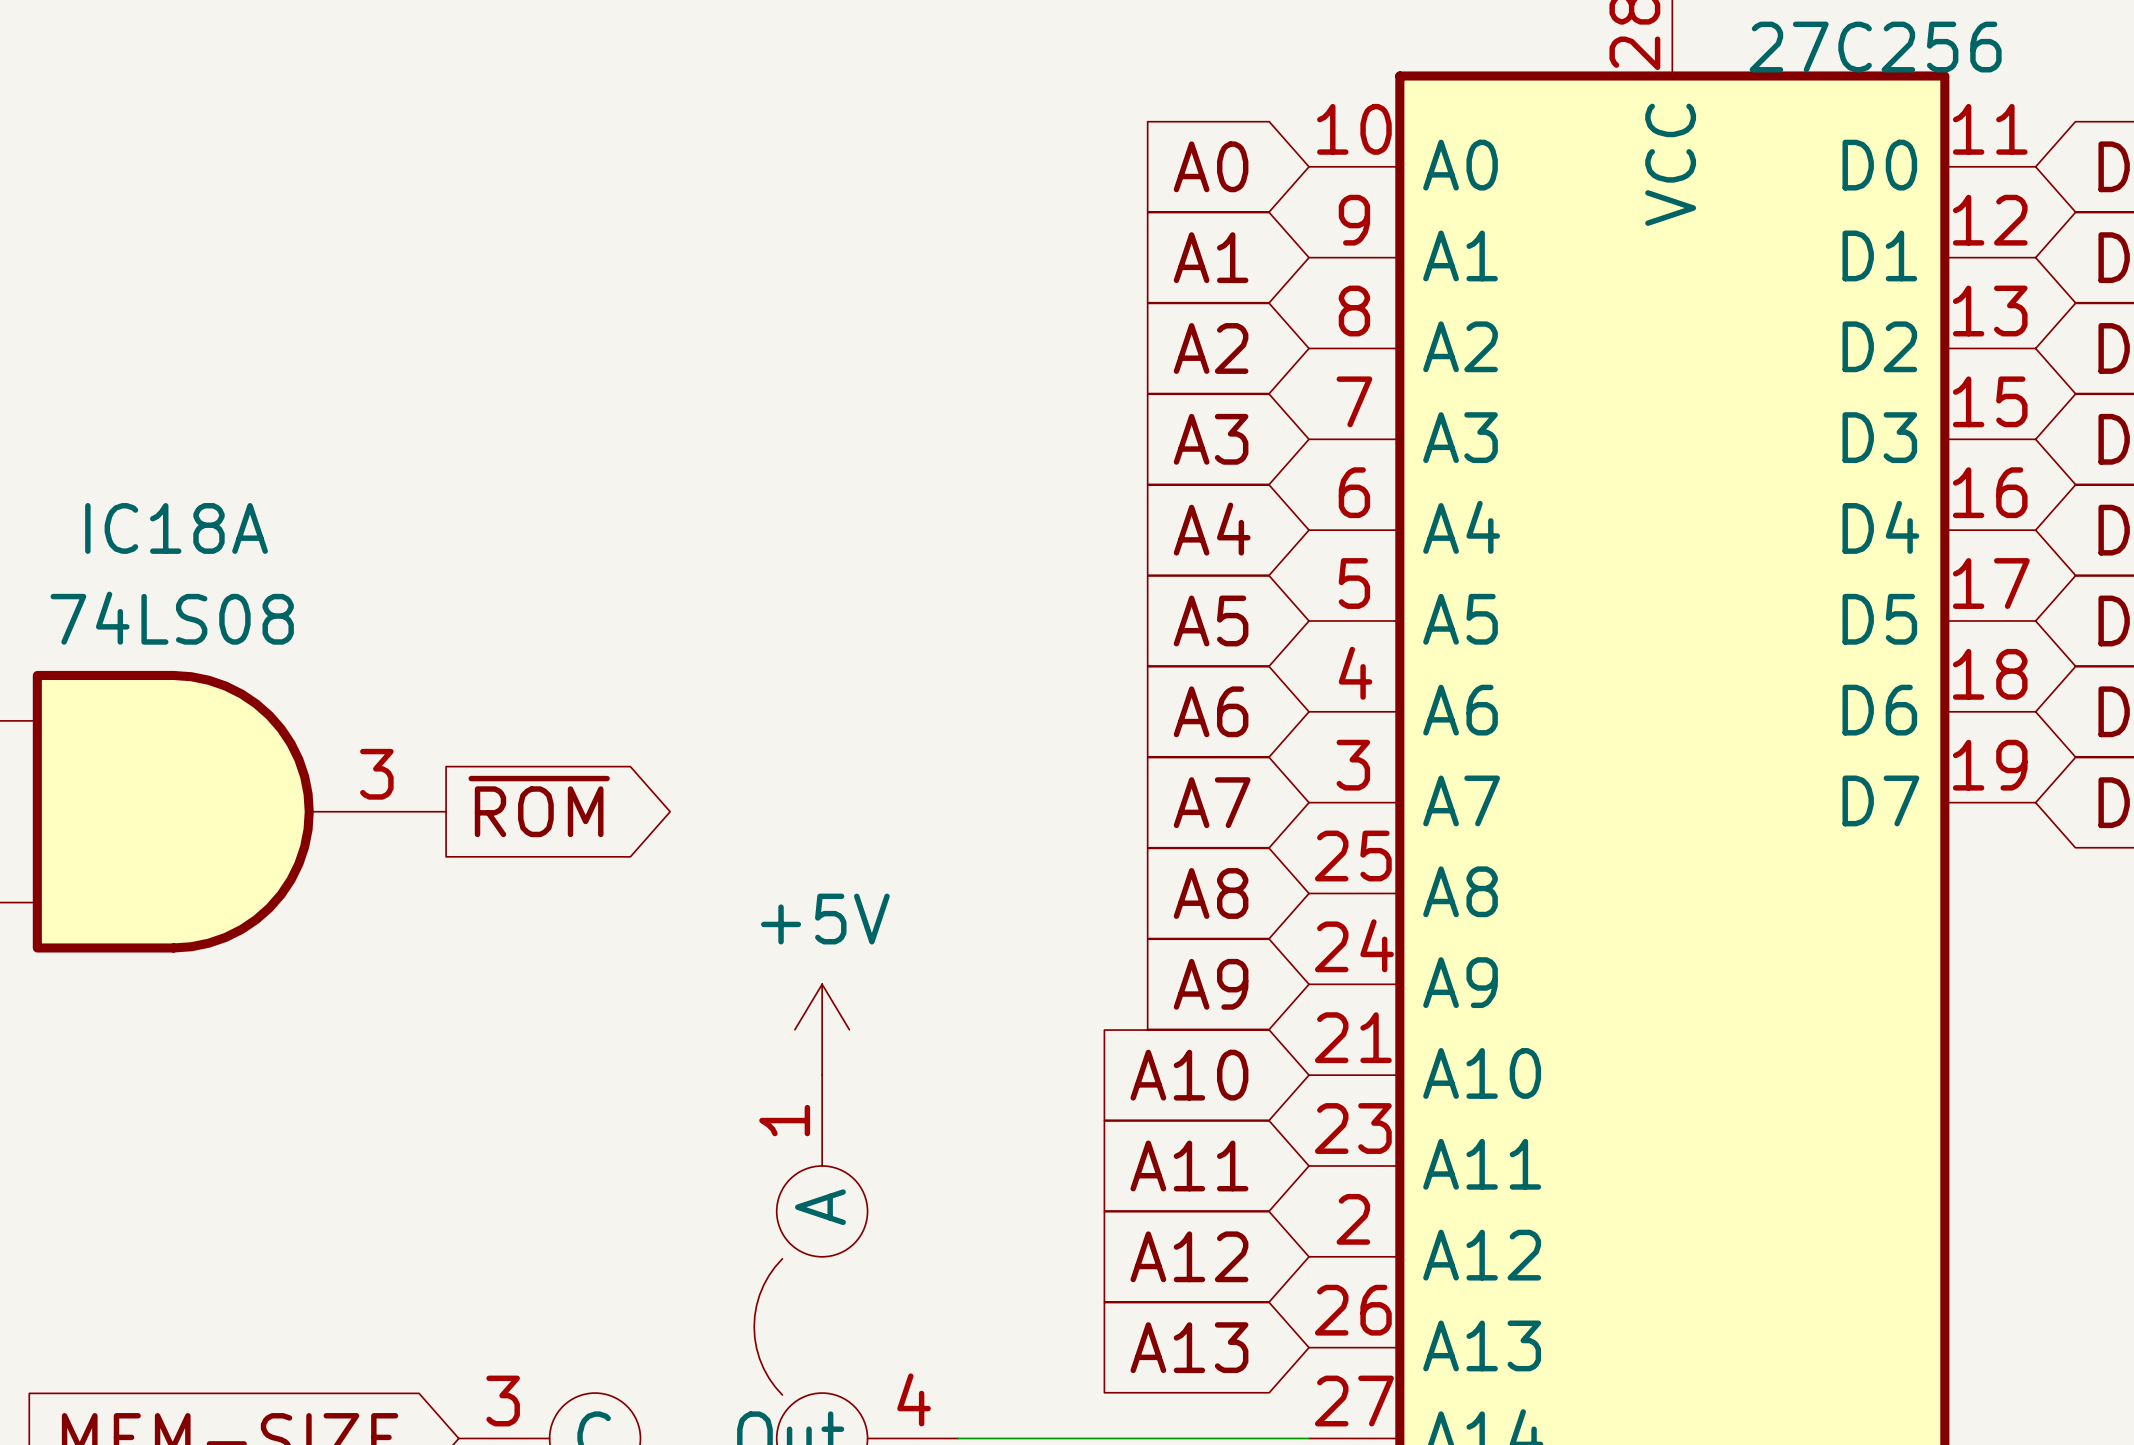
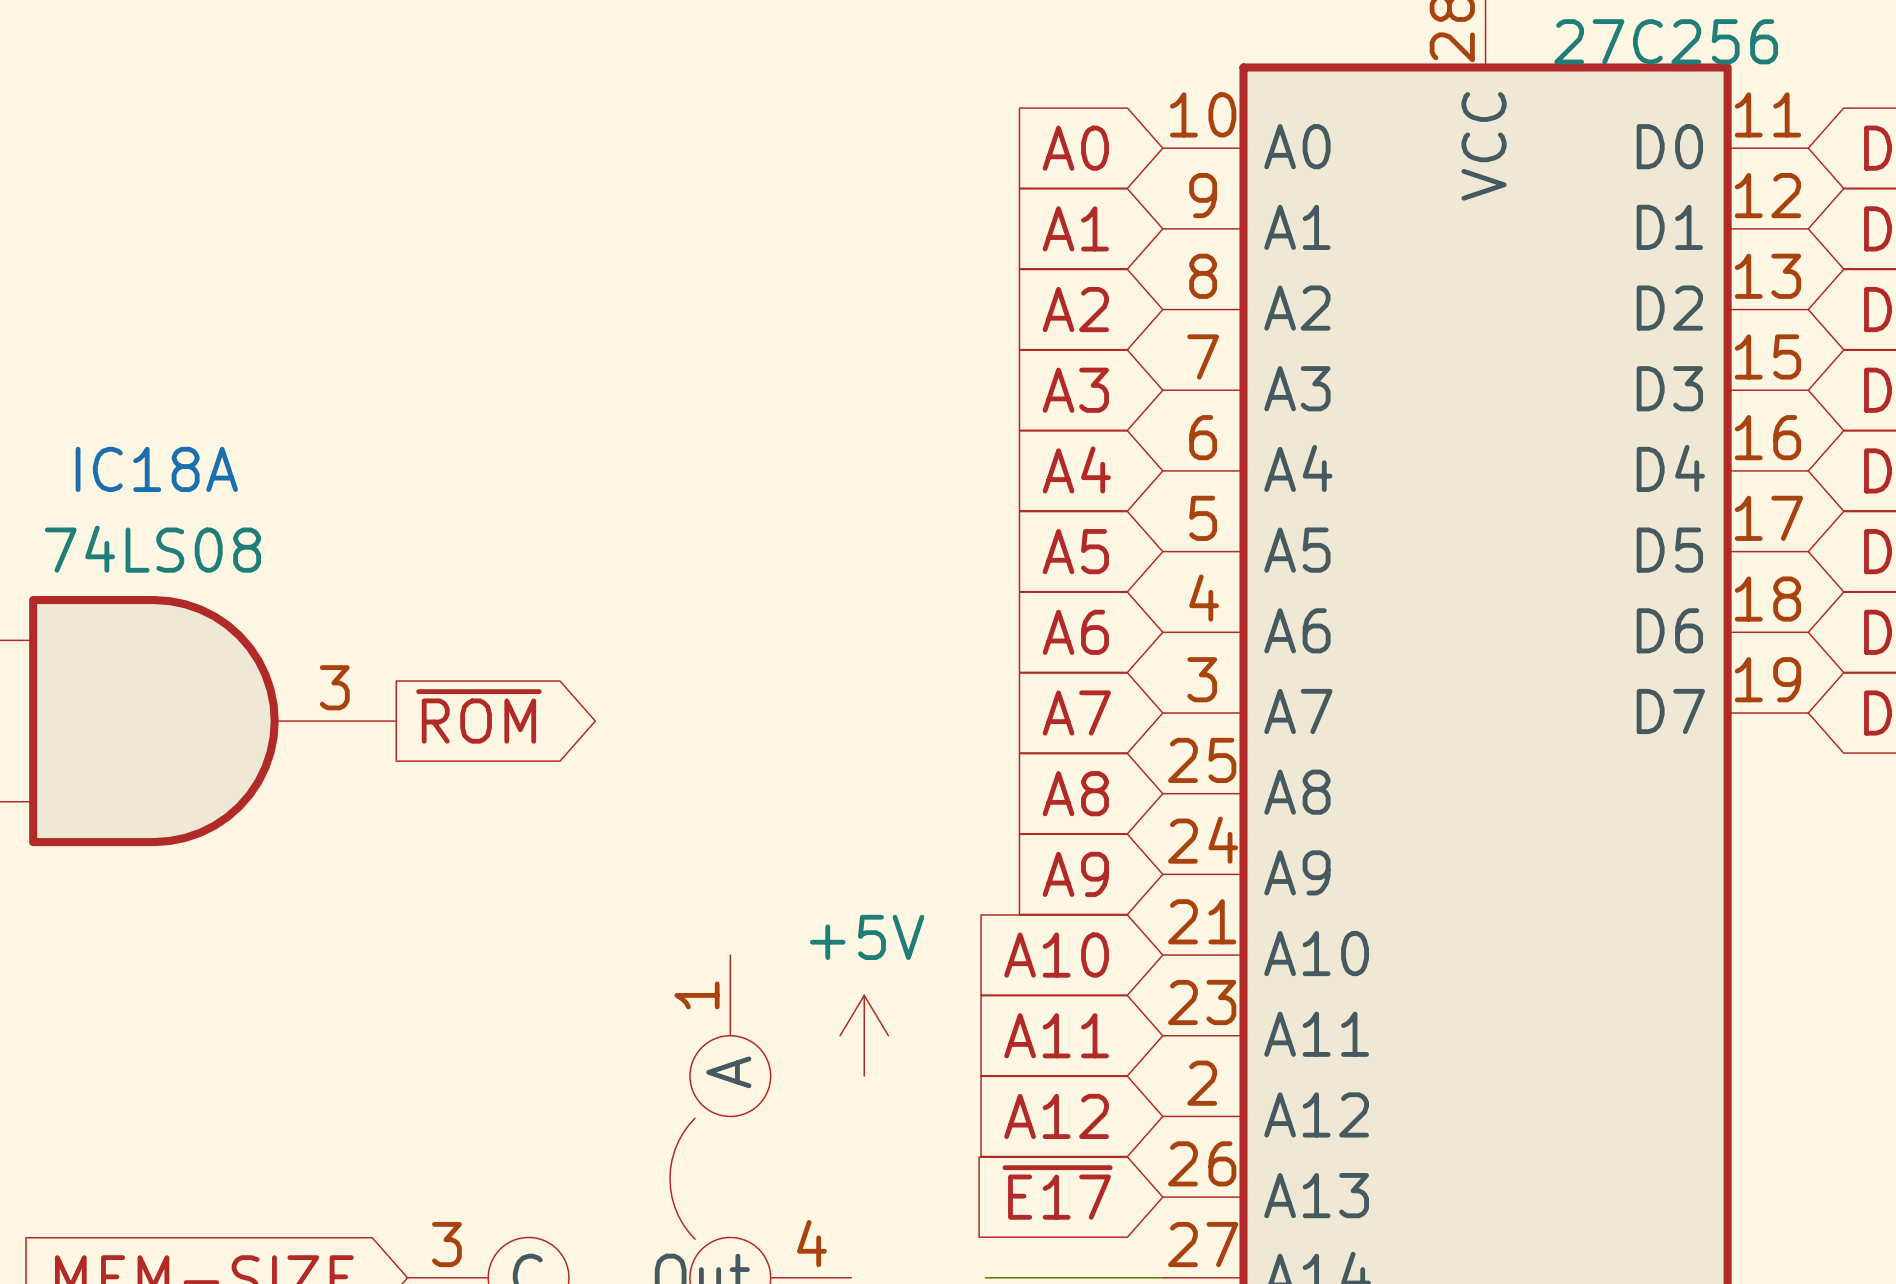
power symbol position: +5V (822, 1029) -> +5V (864, 1035)
global label: A13 (1189, 1347) -> ~{E17} (1057, 1192)
wire: (958, 1438) (1109, 1438) -> none

